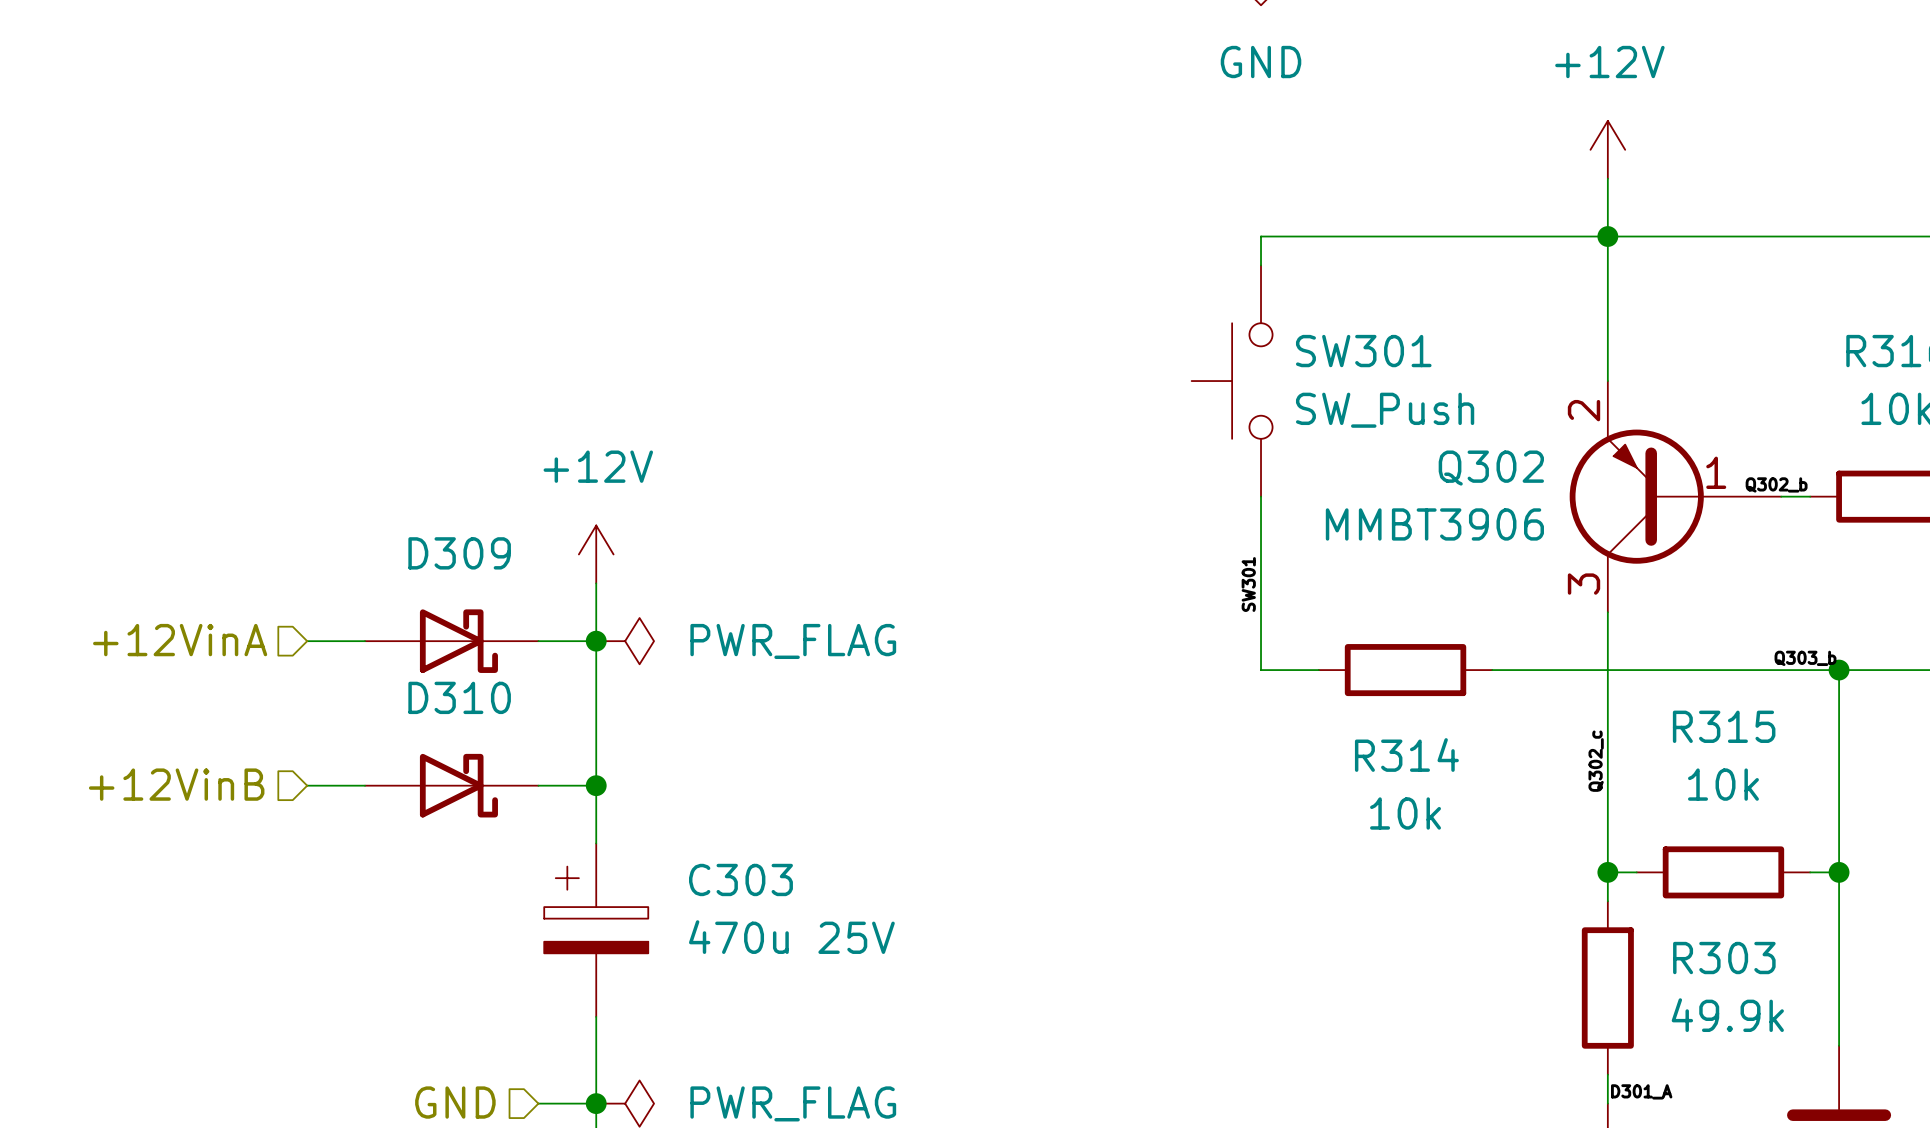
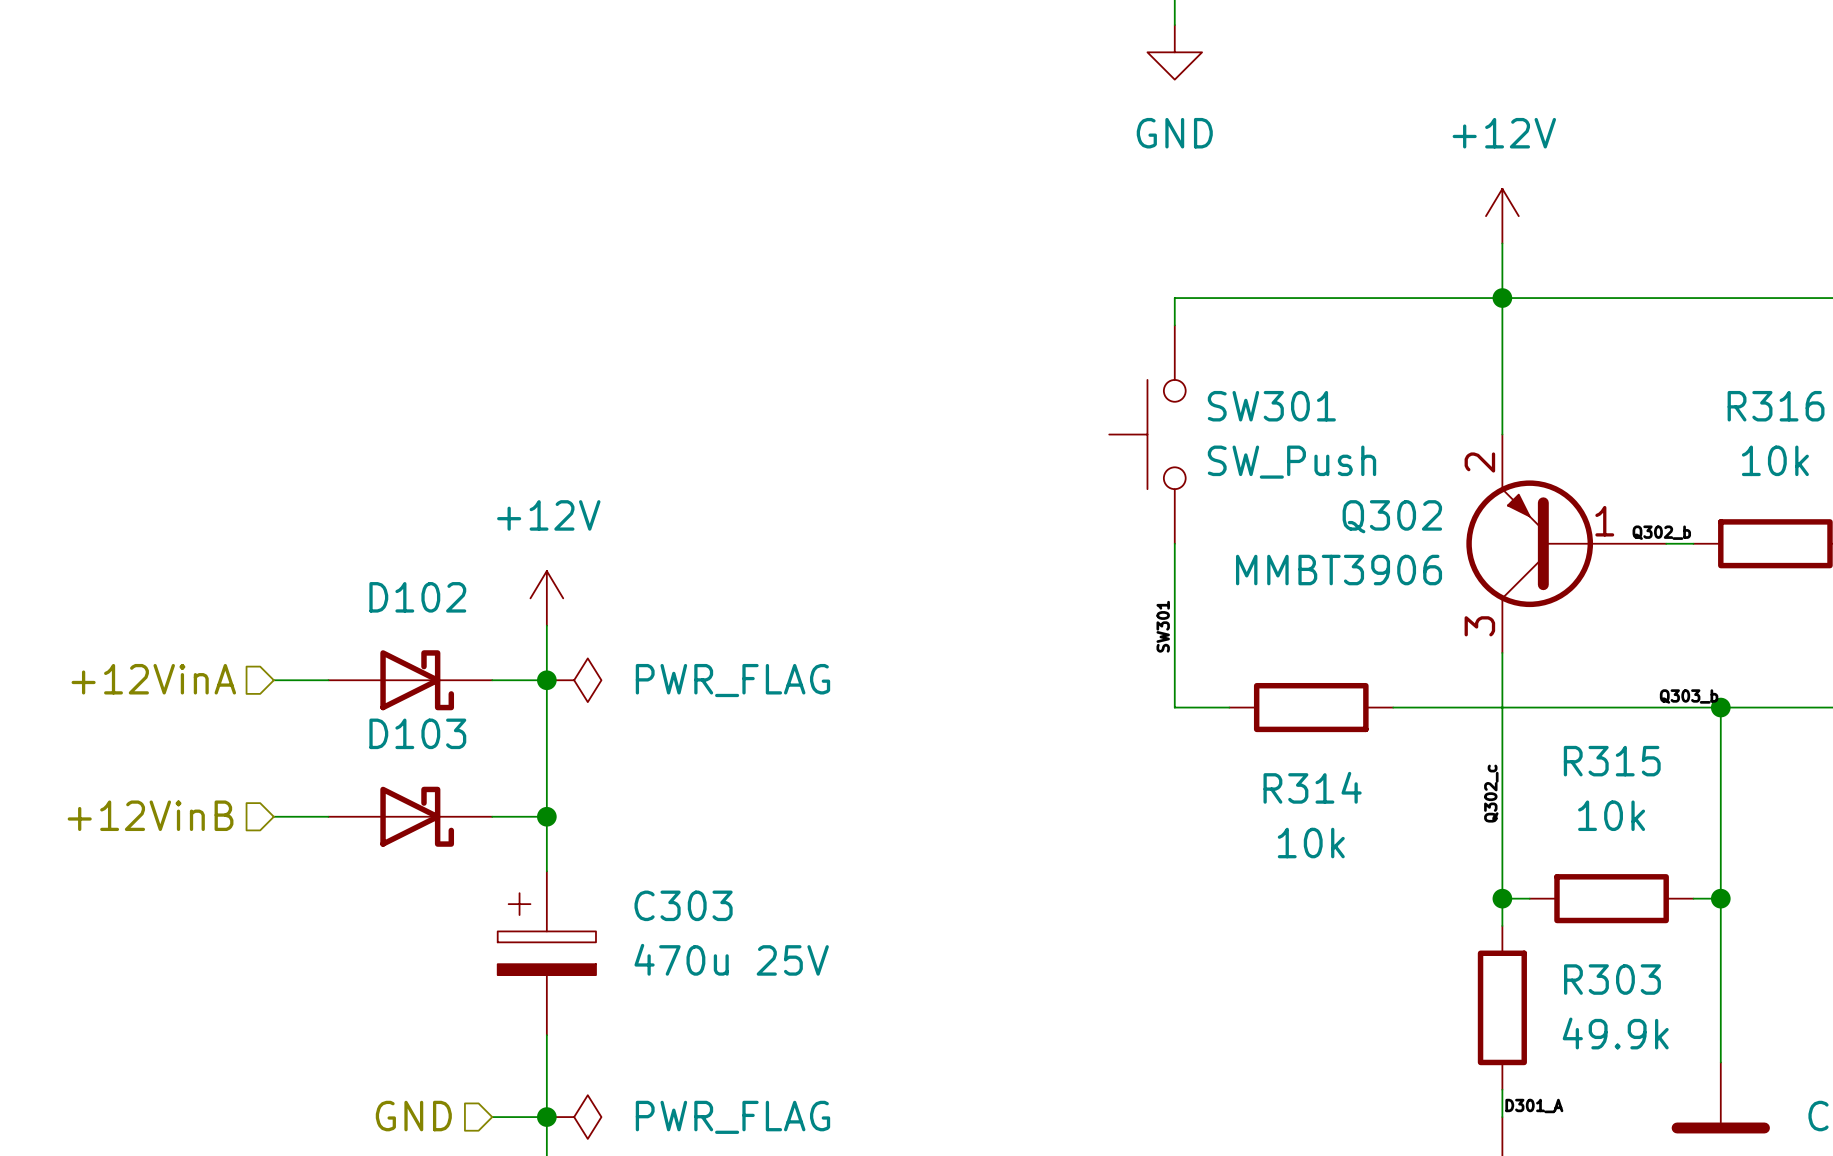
D309 name: D309 (459, 553) -> D102 (417, 597)
D310 name: D310 (459, 697) -> D103 (417, 733)

